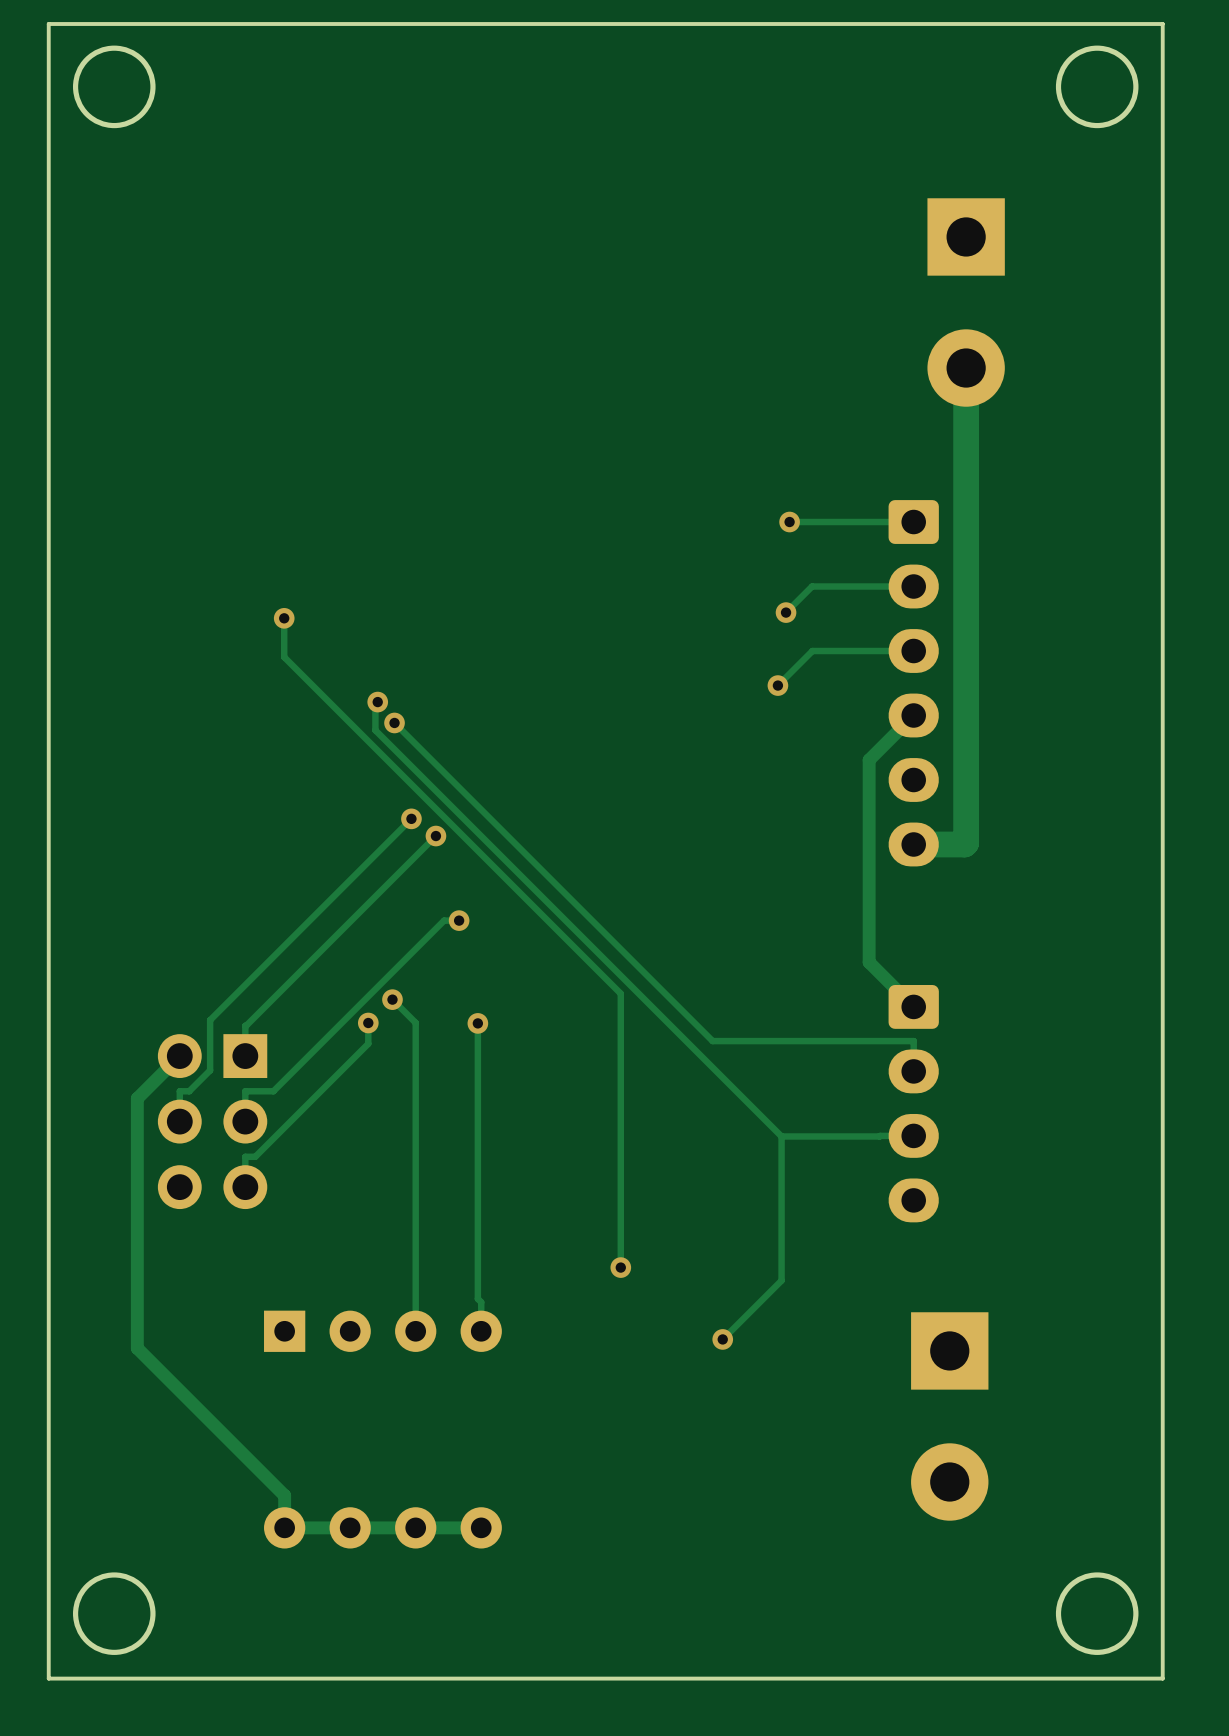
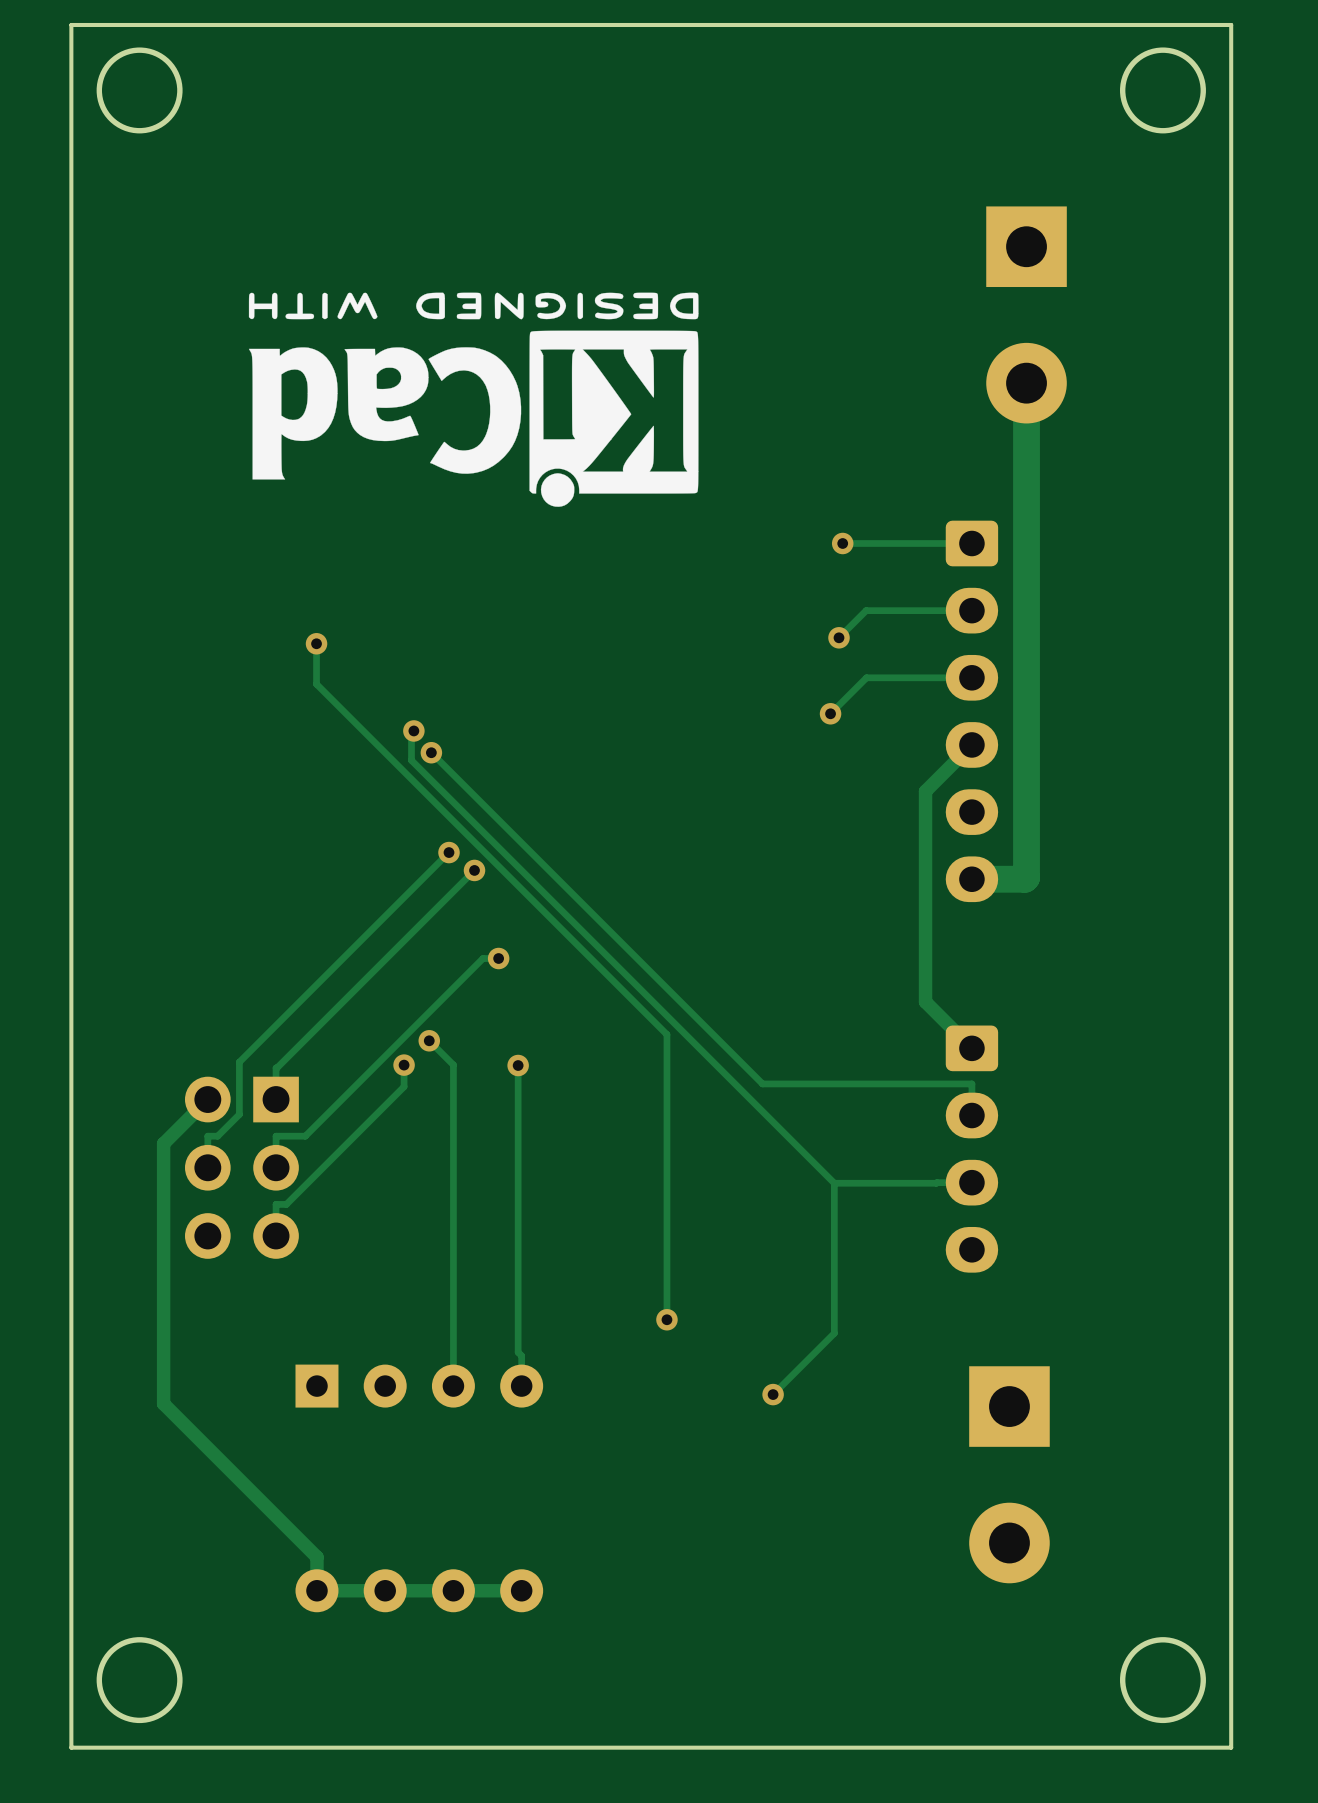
drawing: none -> [248, 292, 699, 507]

